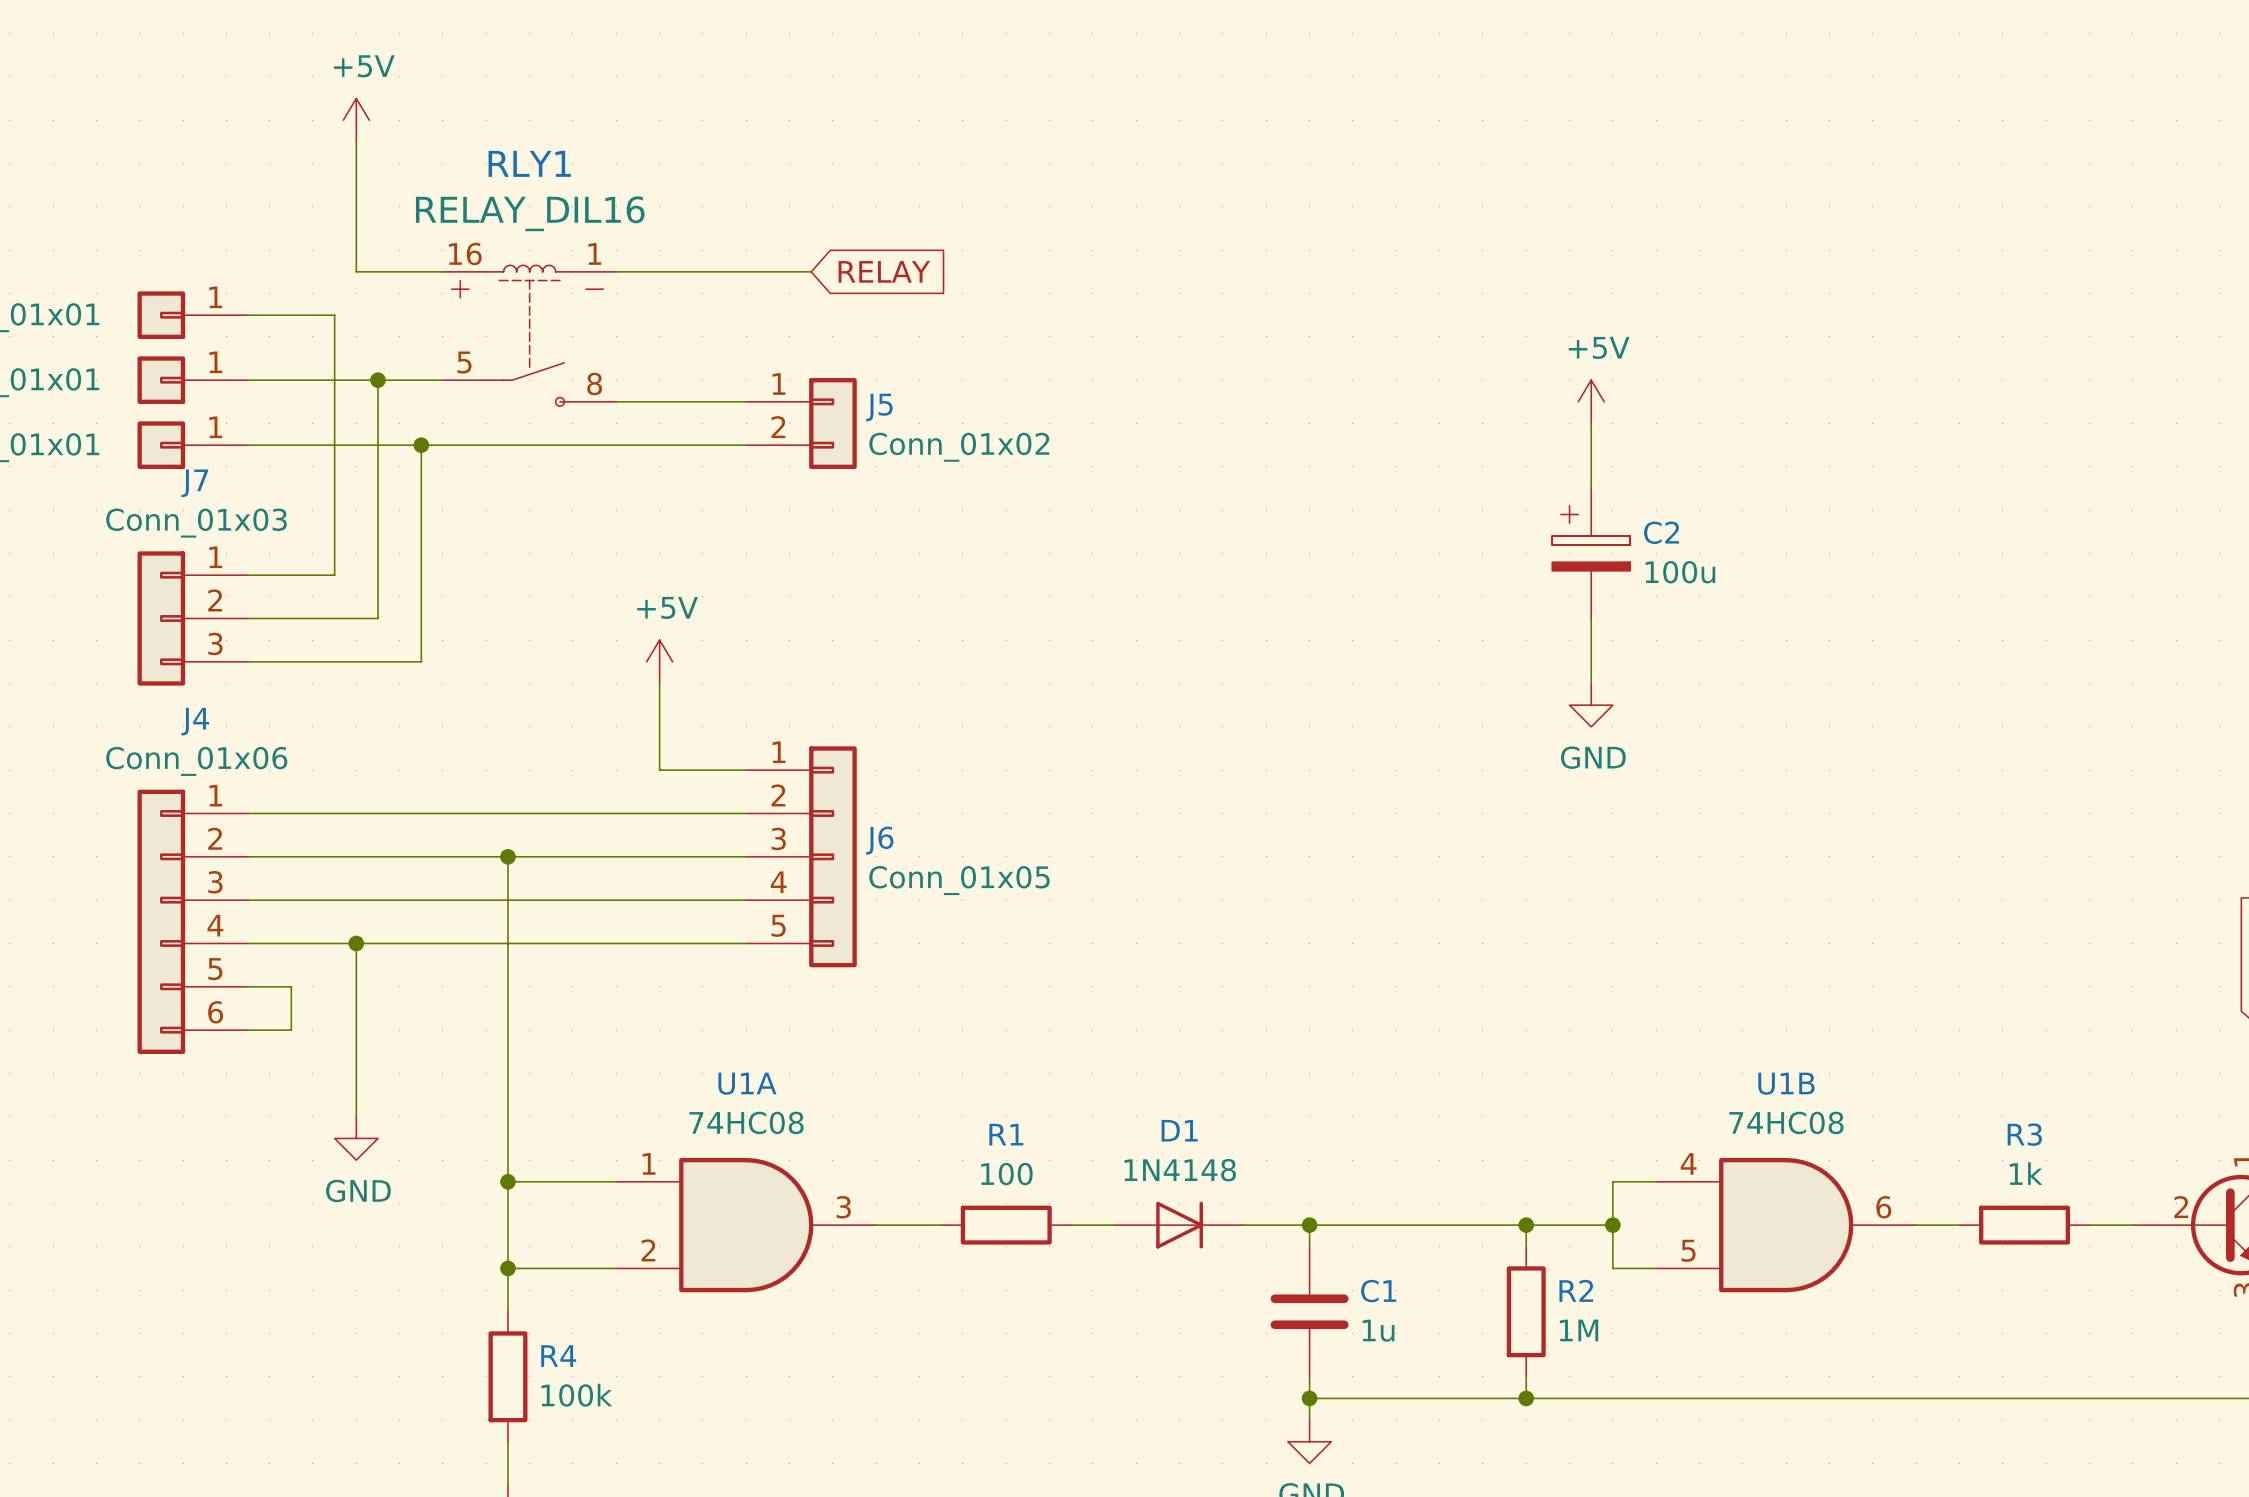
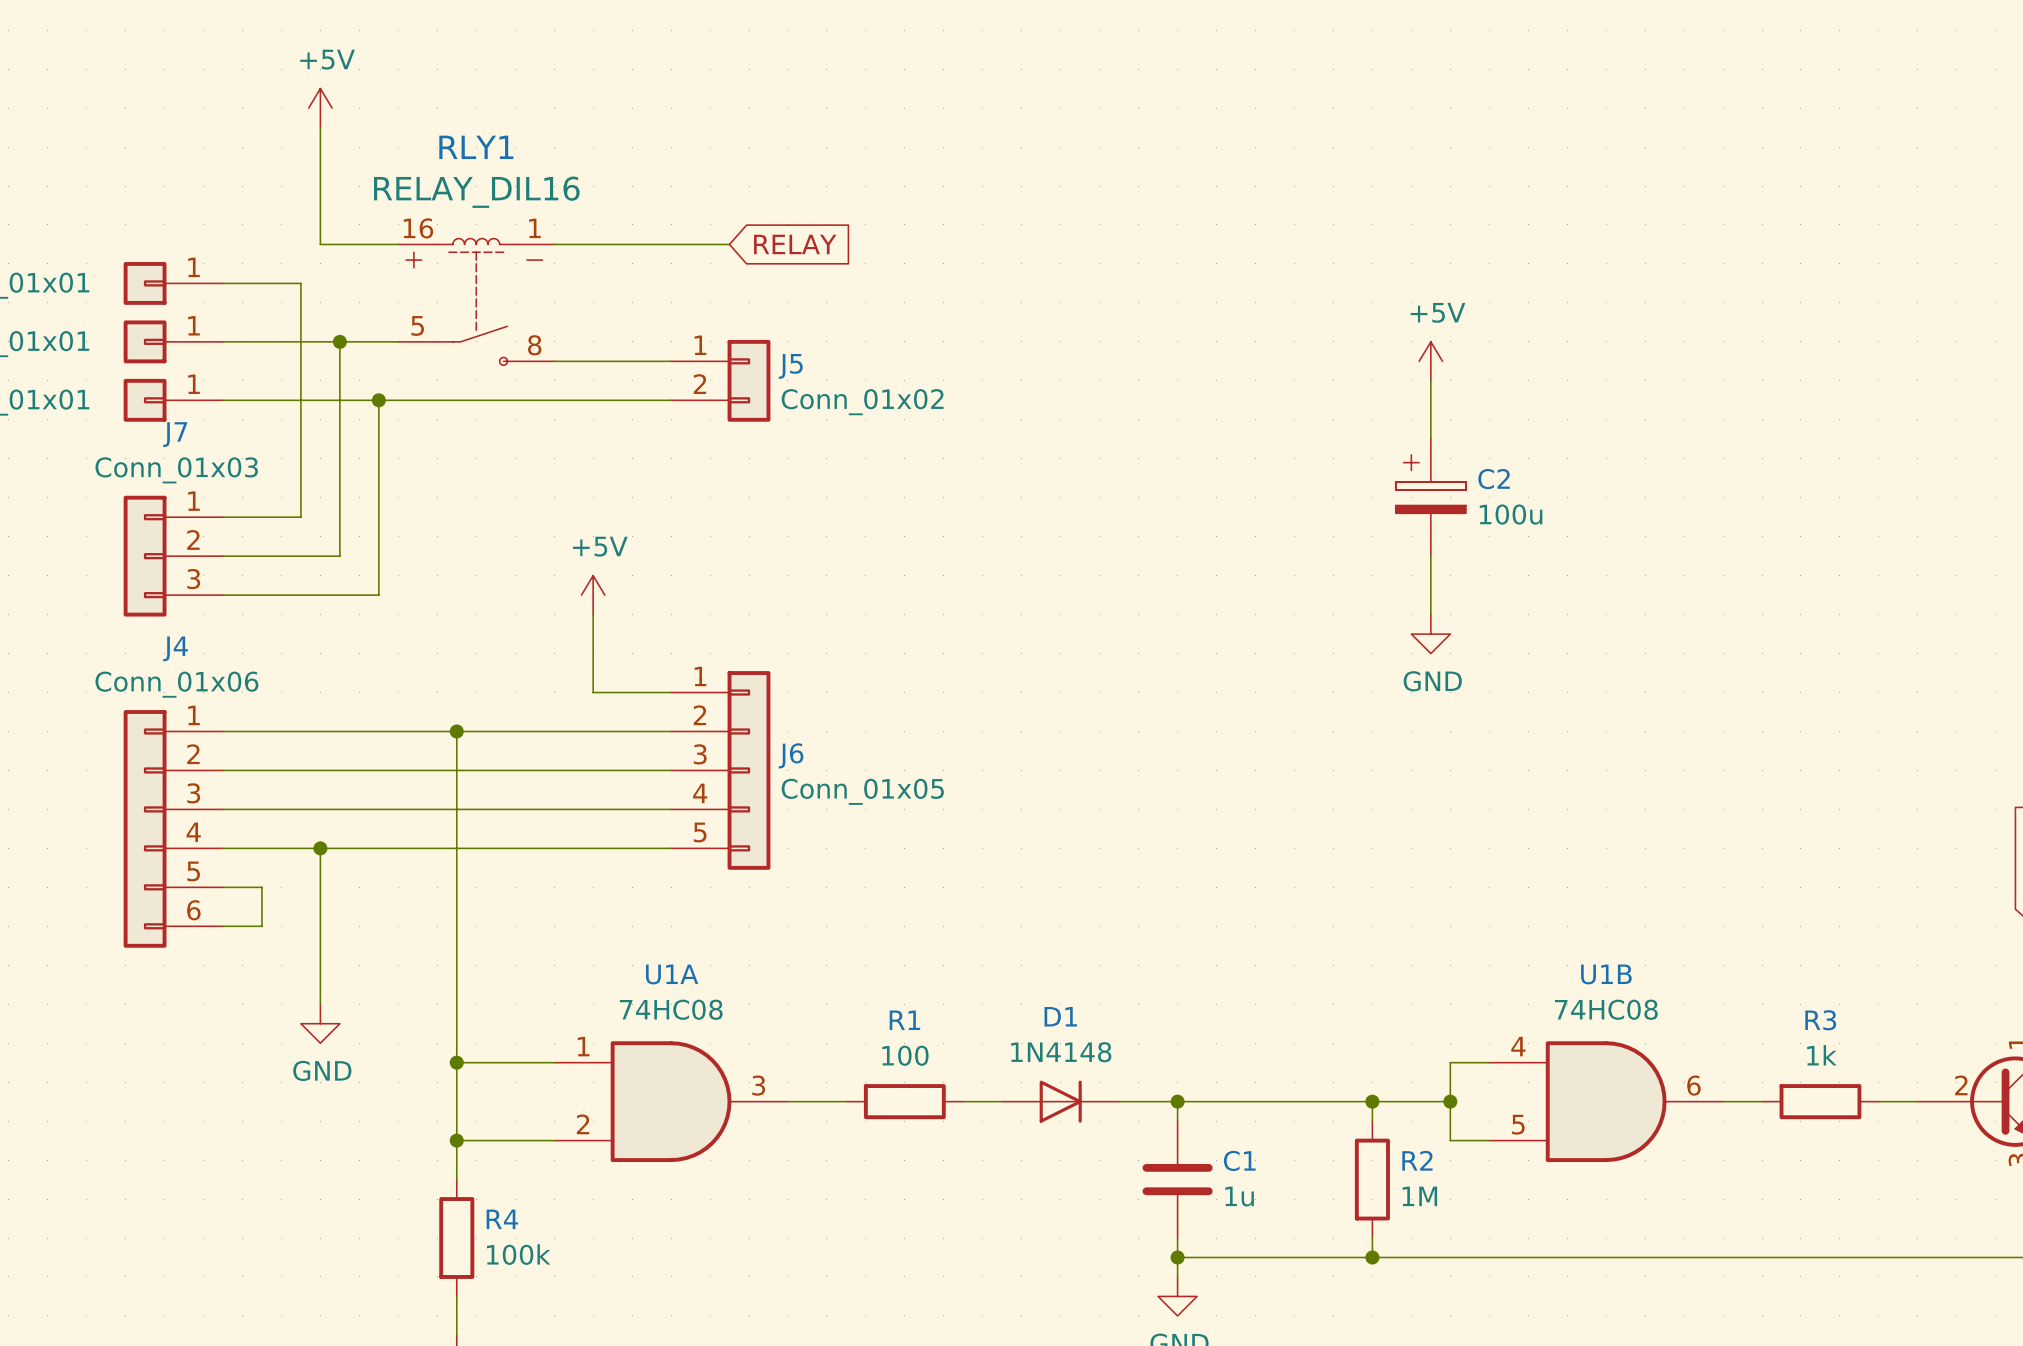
wire: none -> (456, 731) (456, 770)
junction position: (507, 856) -> (456, 731)

